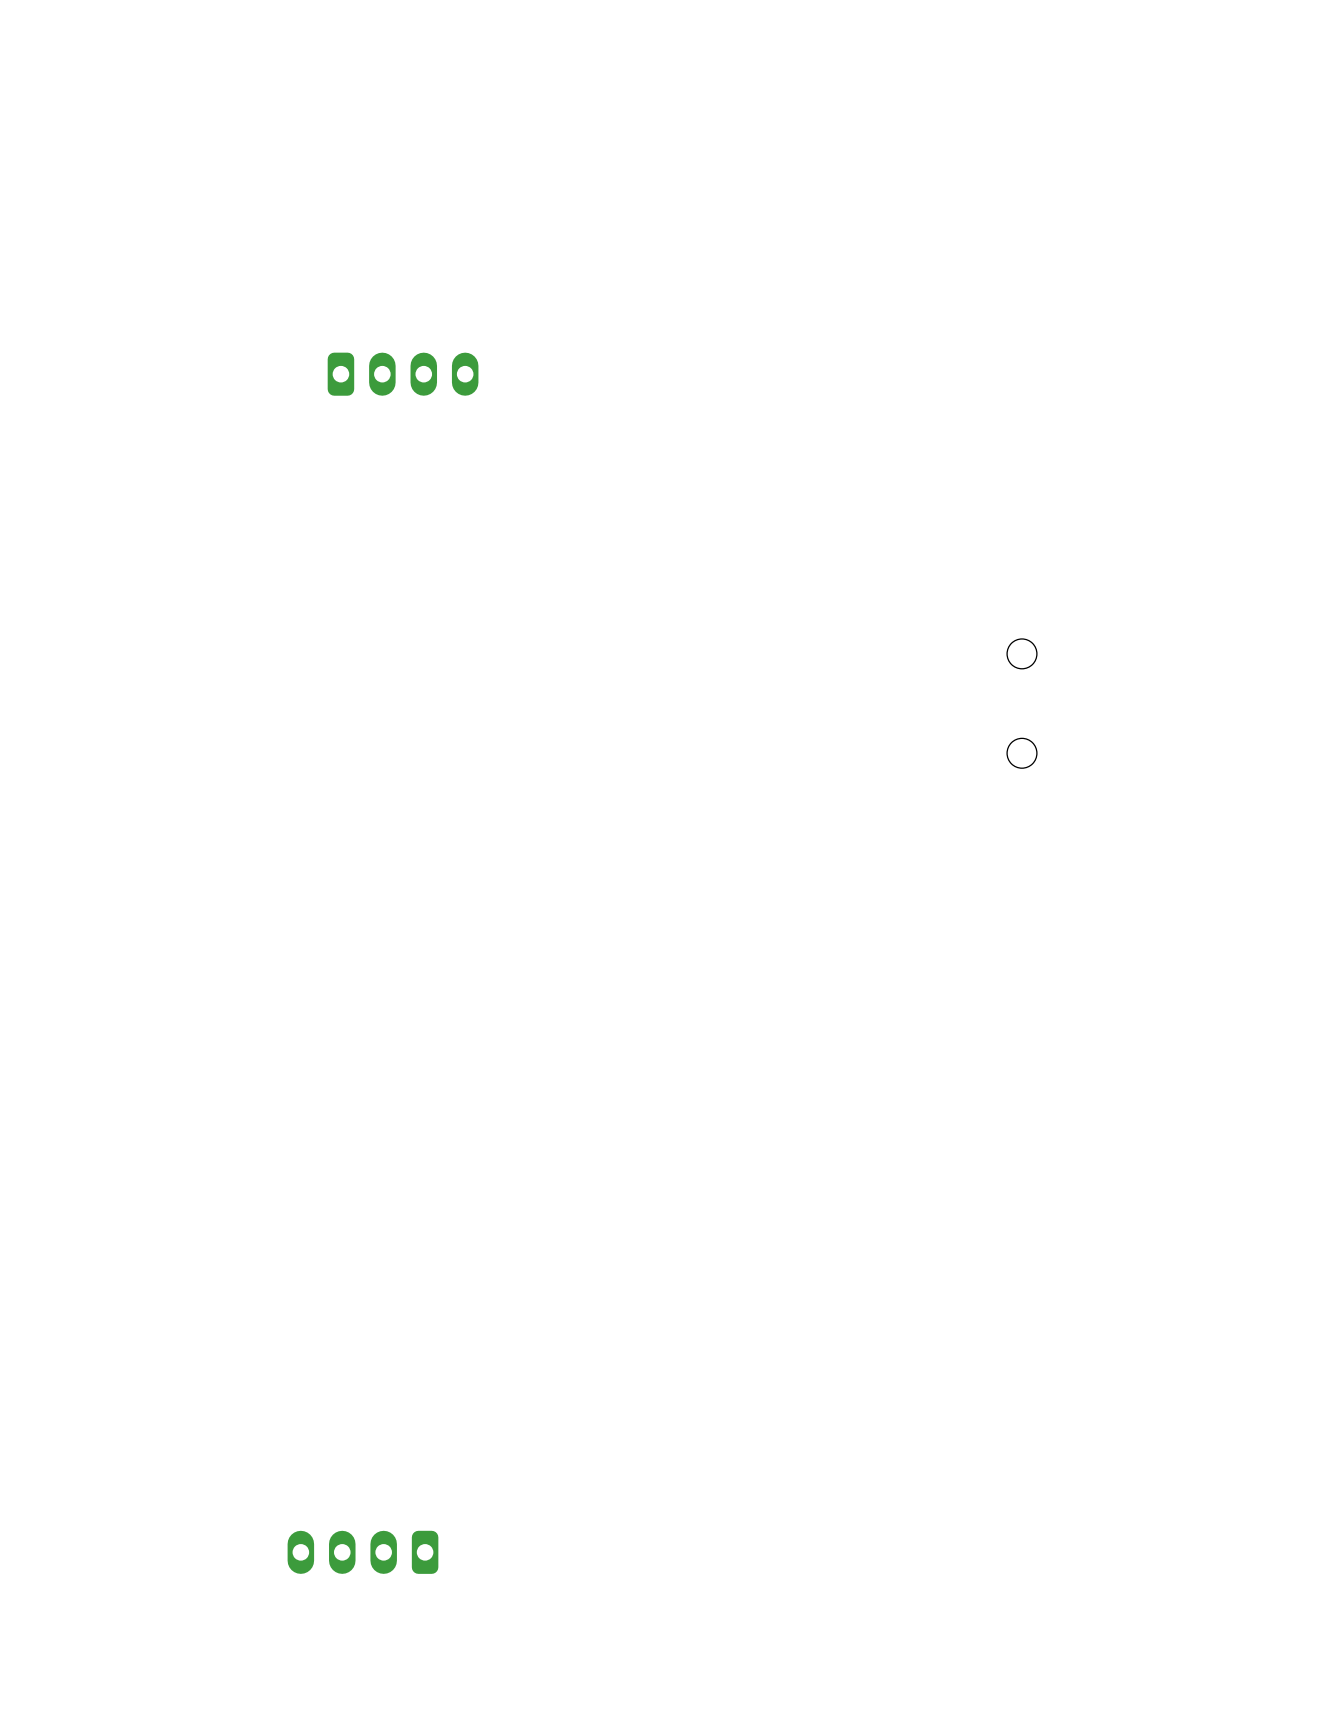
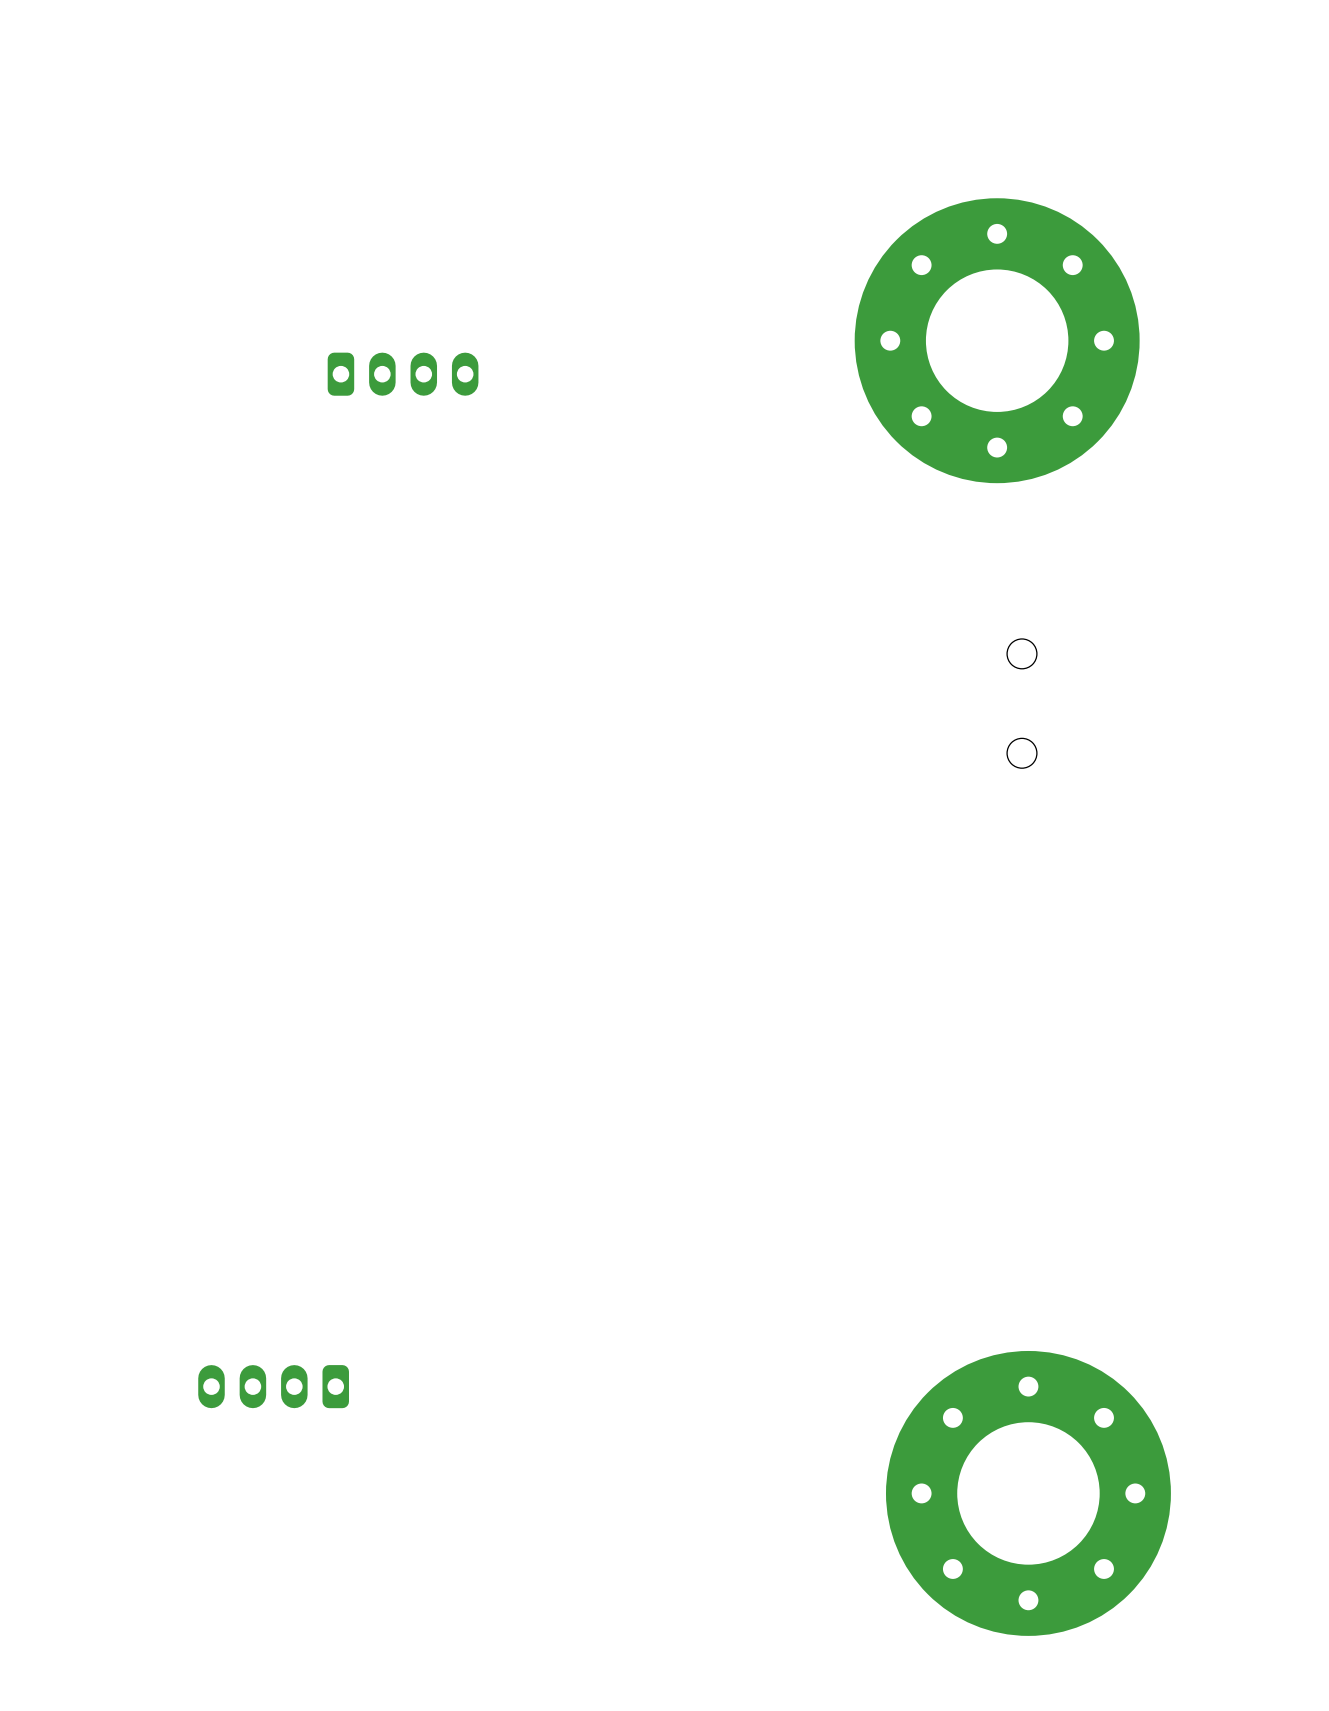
part: none -> (997, 340)
part: none -> (1028, 1493)
part position: (362, 1552) -> (273, 1386)

